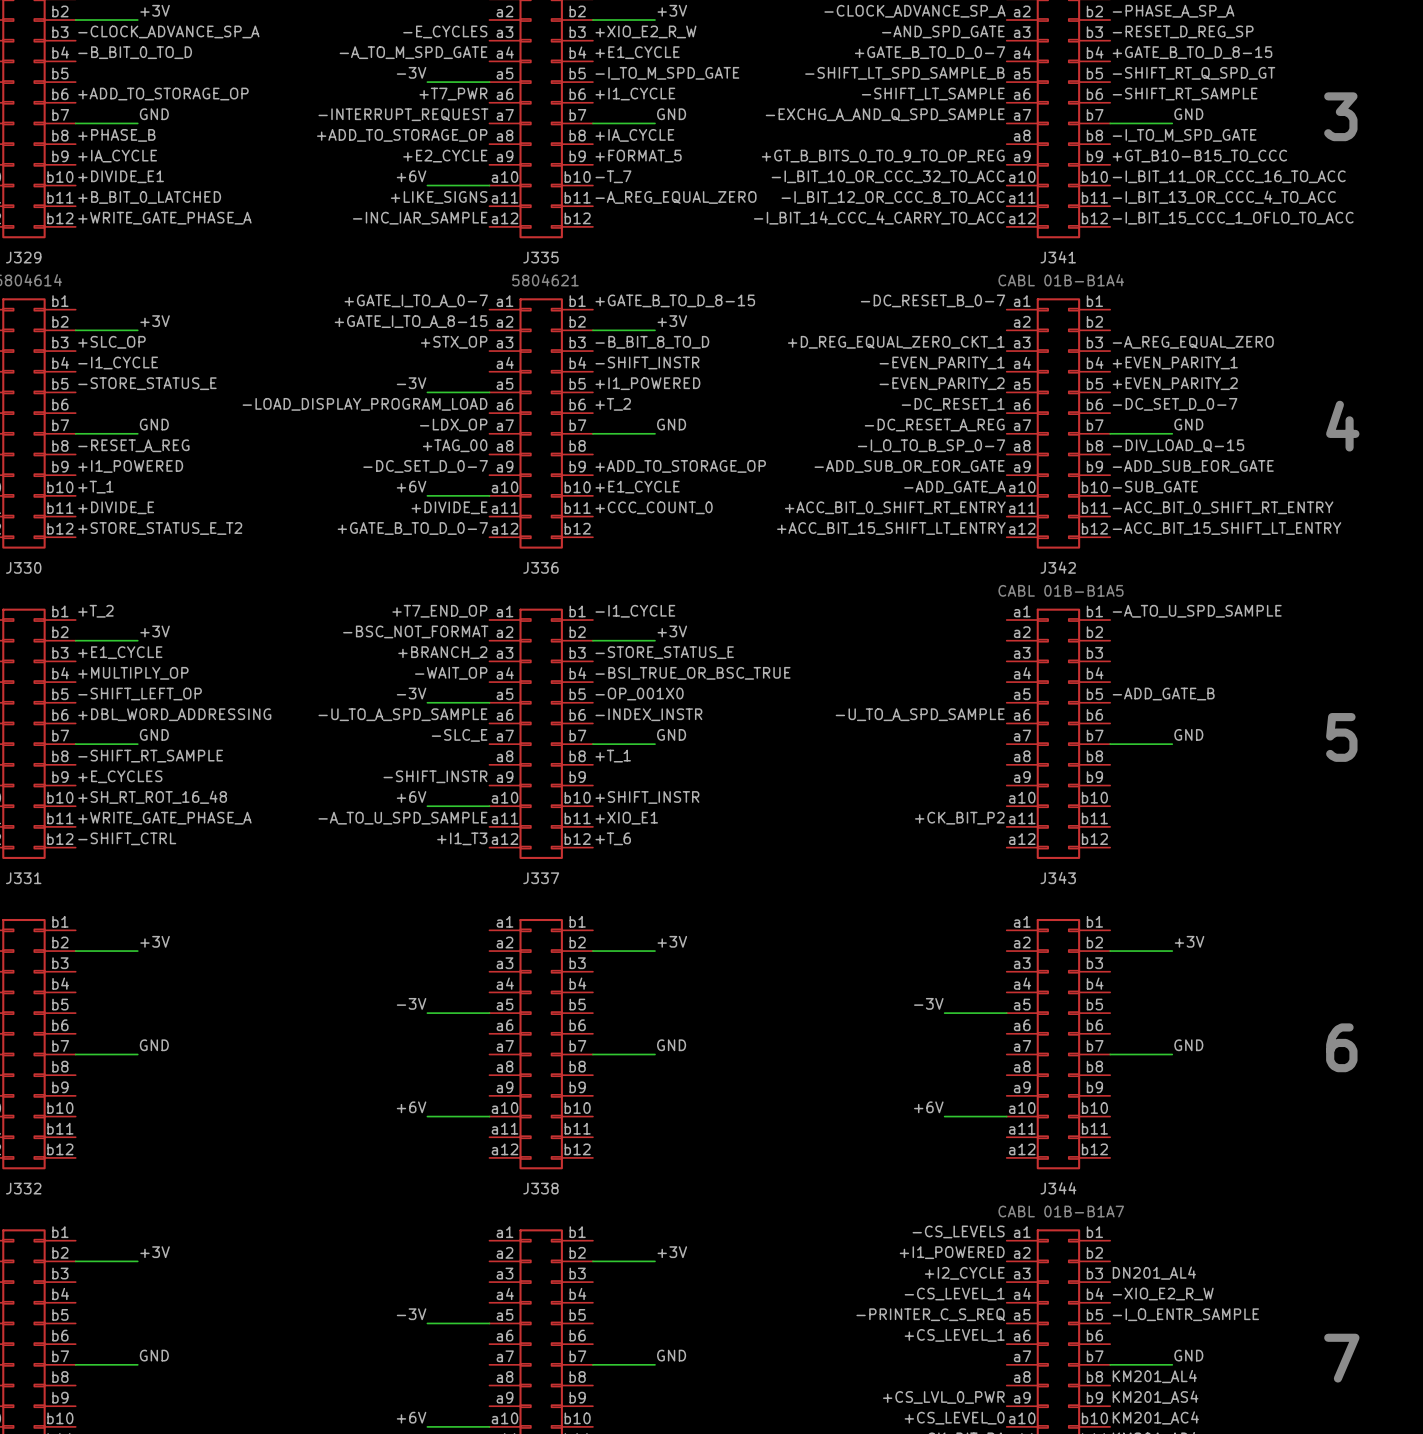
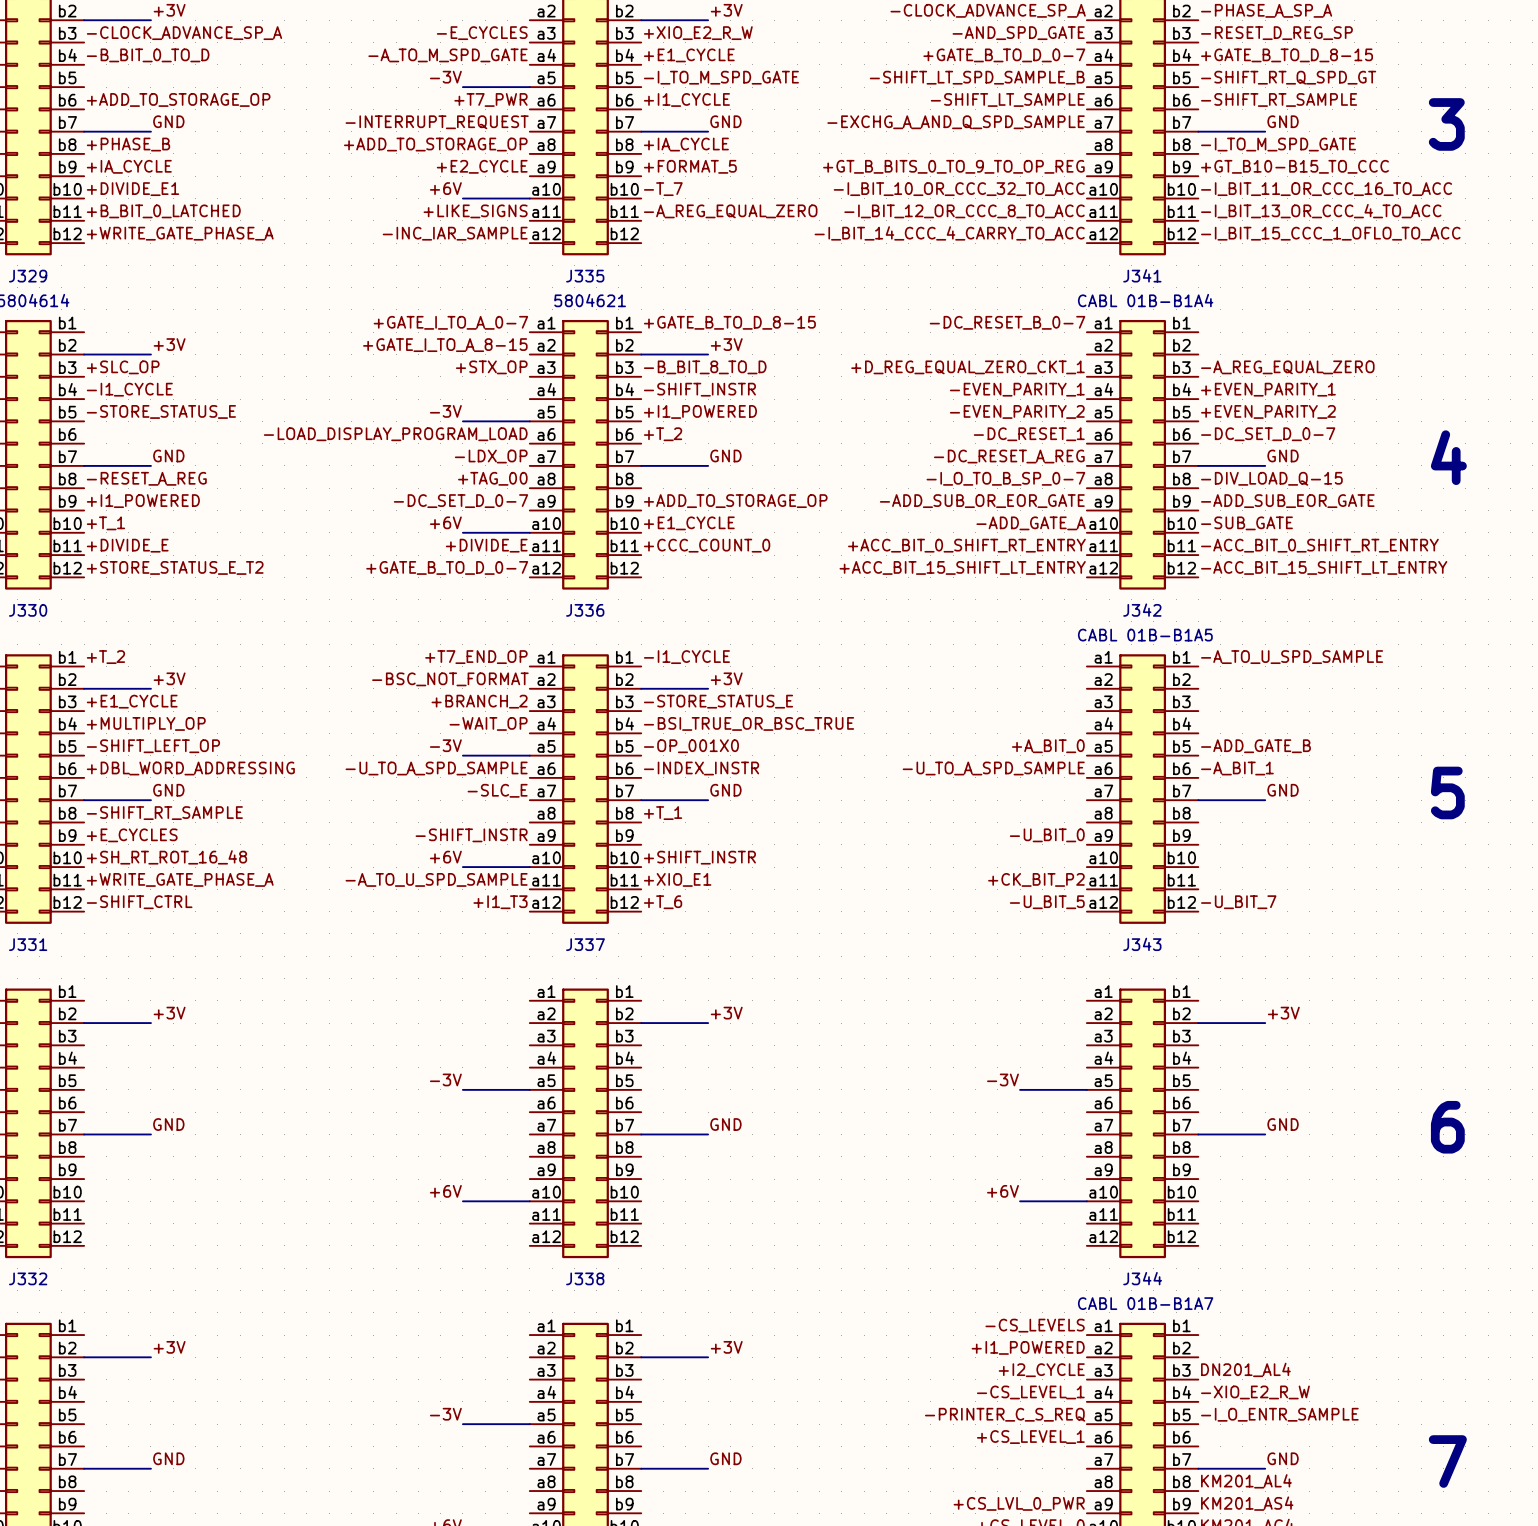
label: none -> +A_BIT_0 (1048, 746)
label: none -> -A_BIT_1 (1237, 768)
label: none -> -U_BIT_0 (1047, 835)
label: none -> -U_BIT_5 (1047, 902)
label: none -> -U_BIT_7 (1238, 902)

